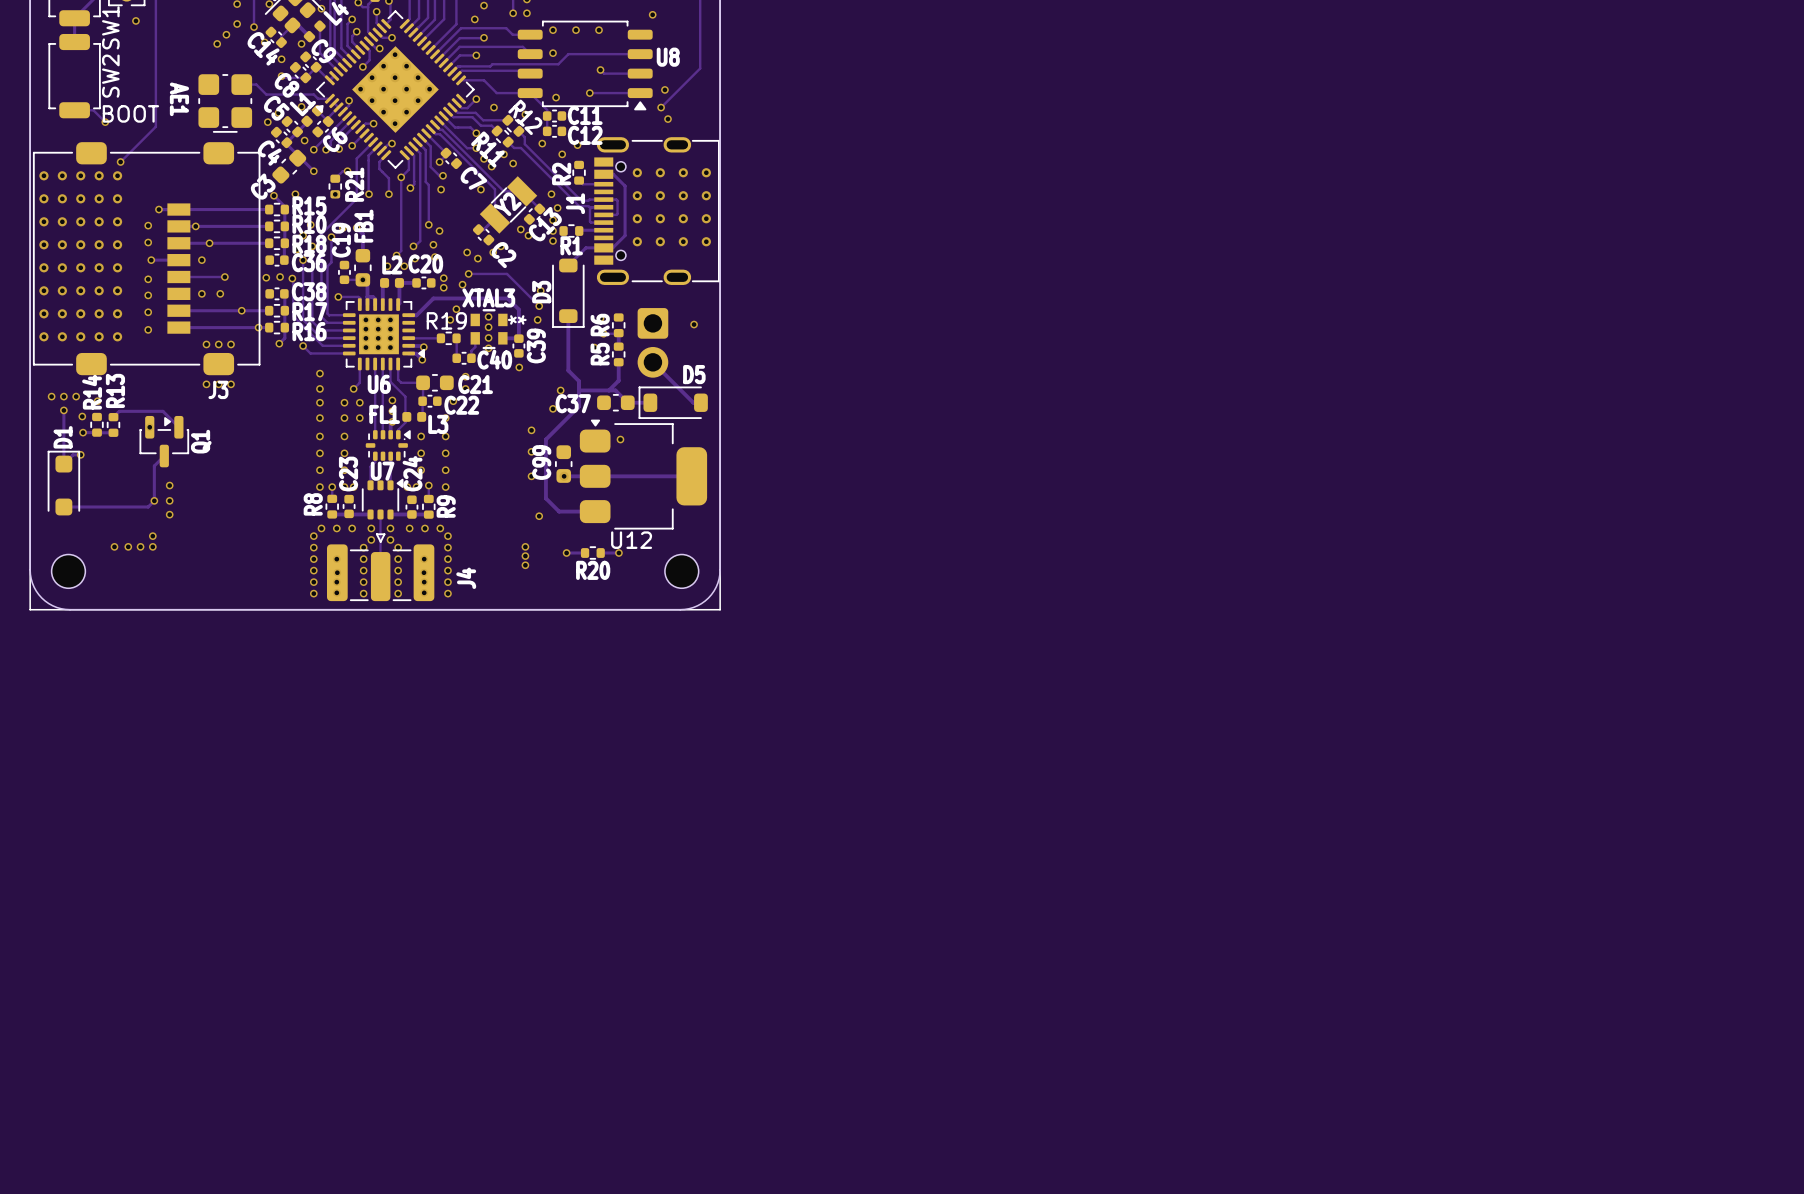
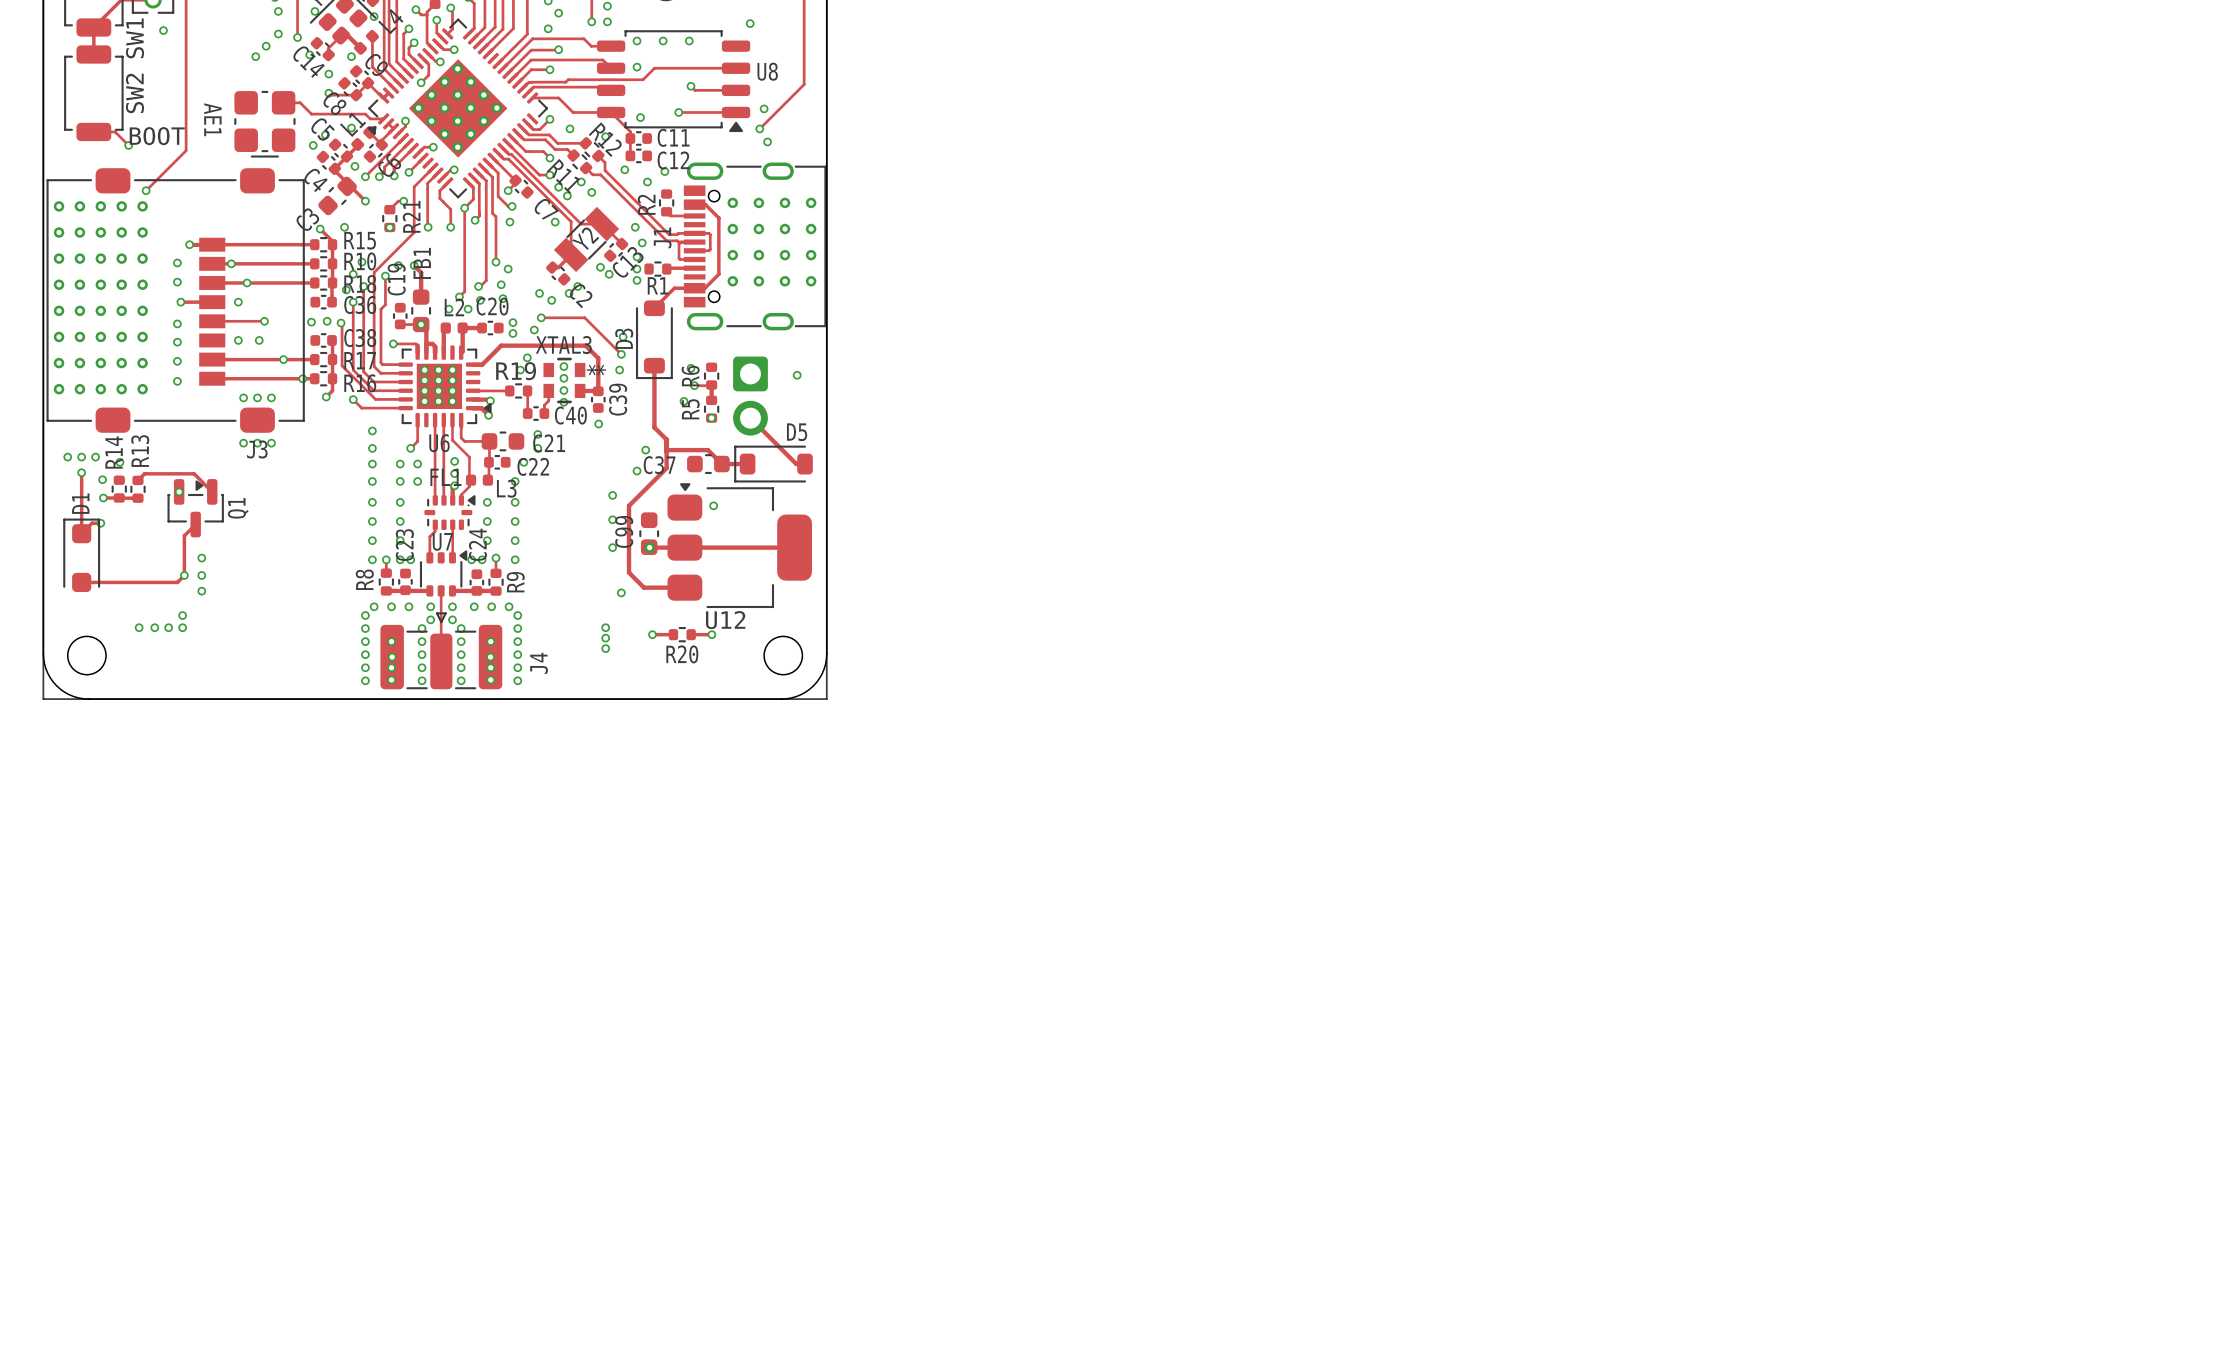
track: (618, 362) (618, 380) (608, 390) -> none
via: none -> (711, 418)

